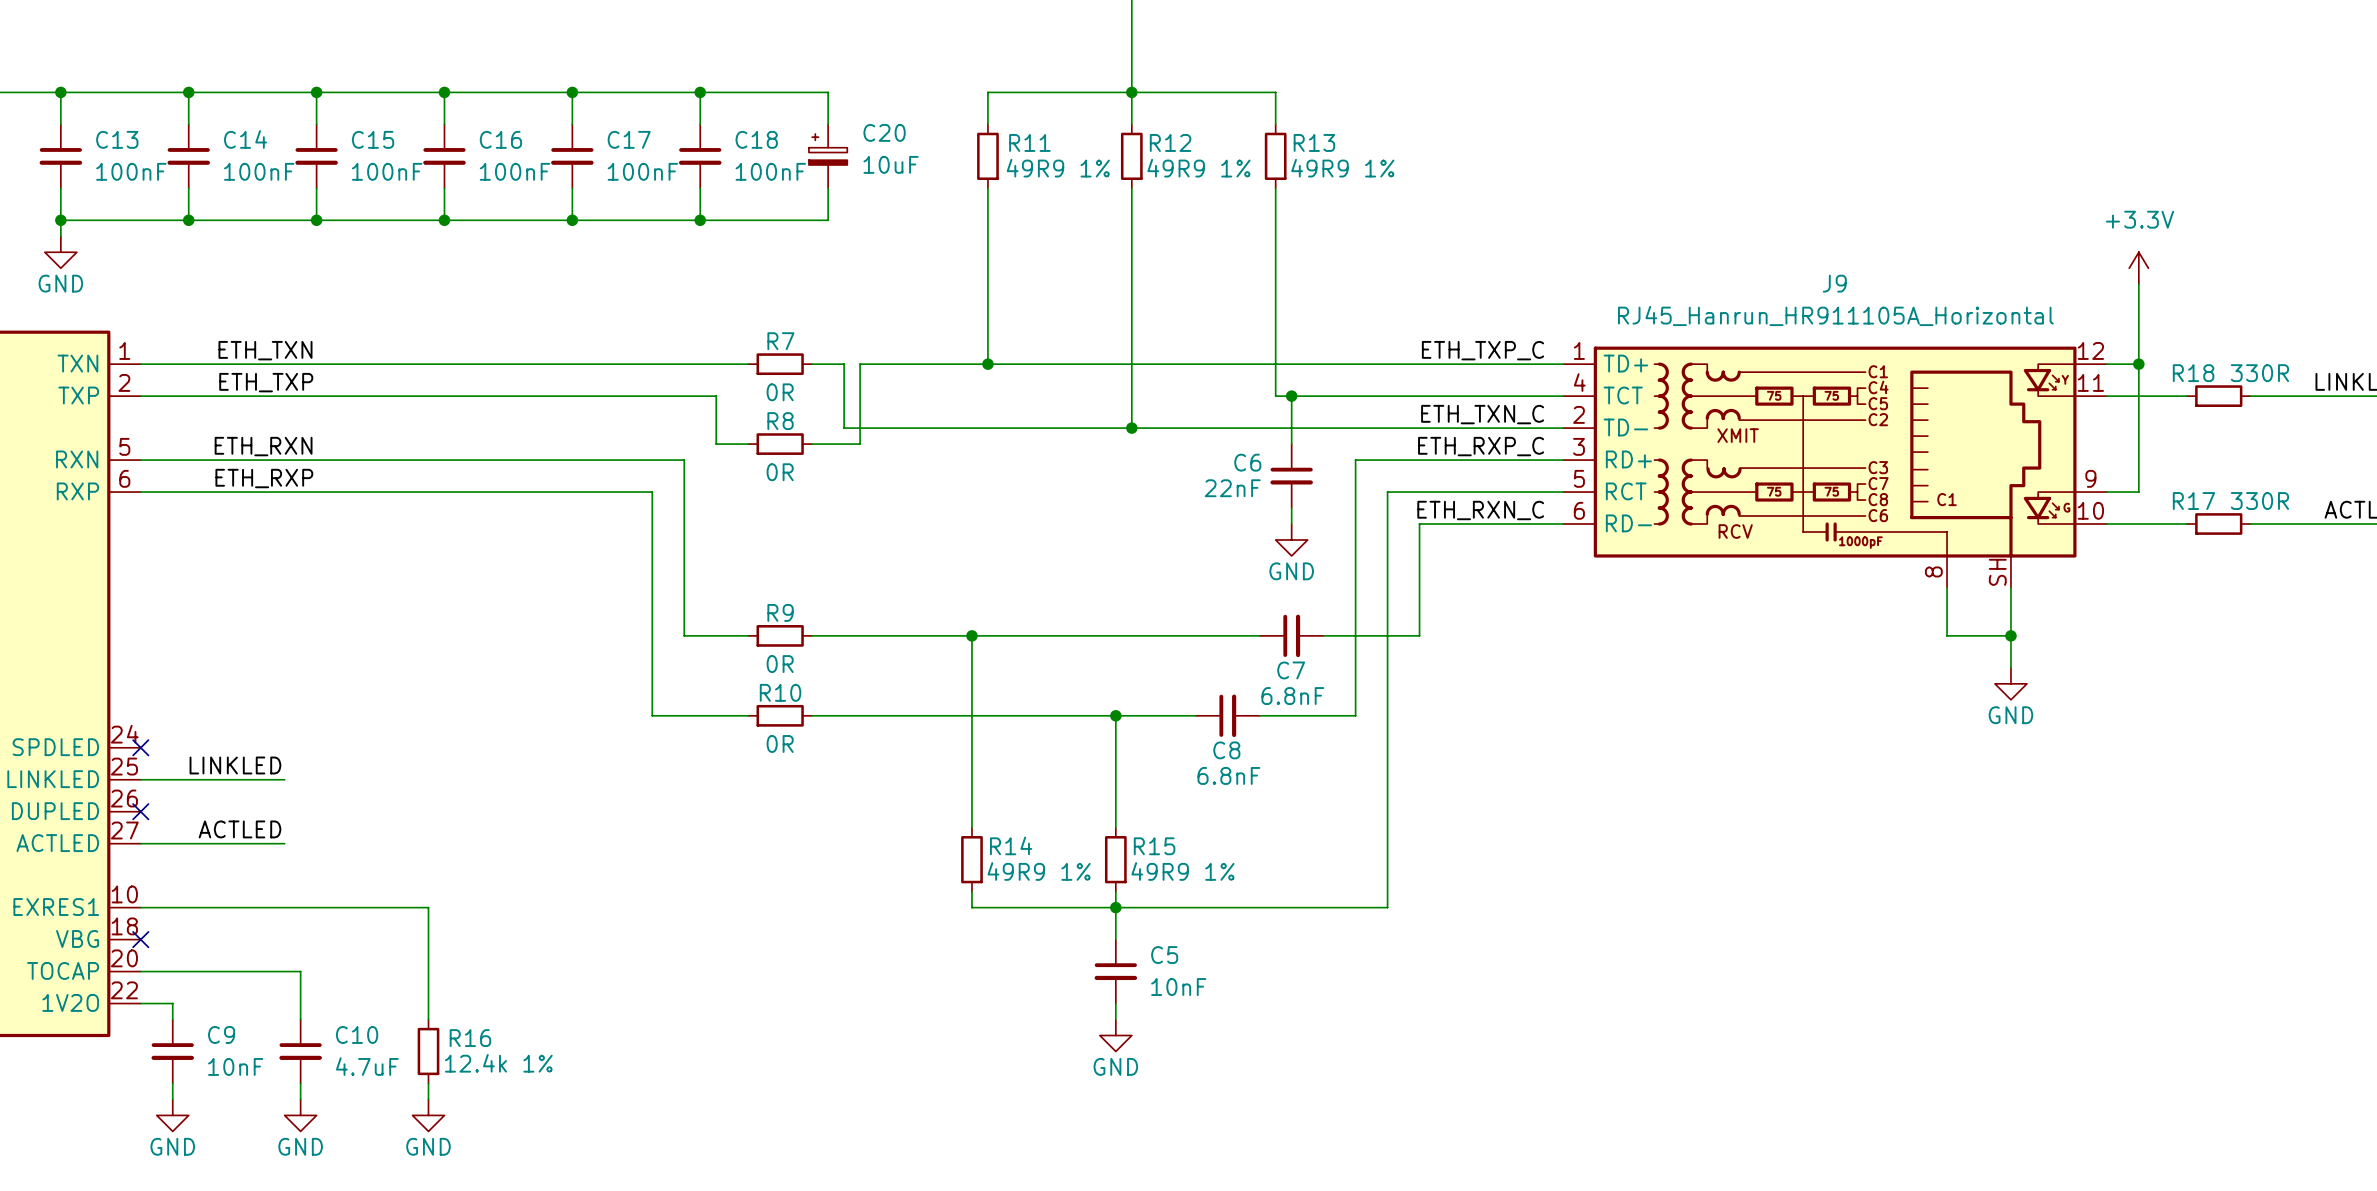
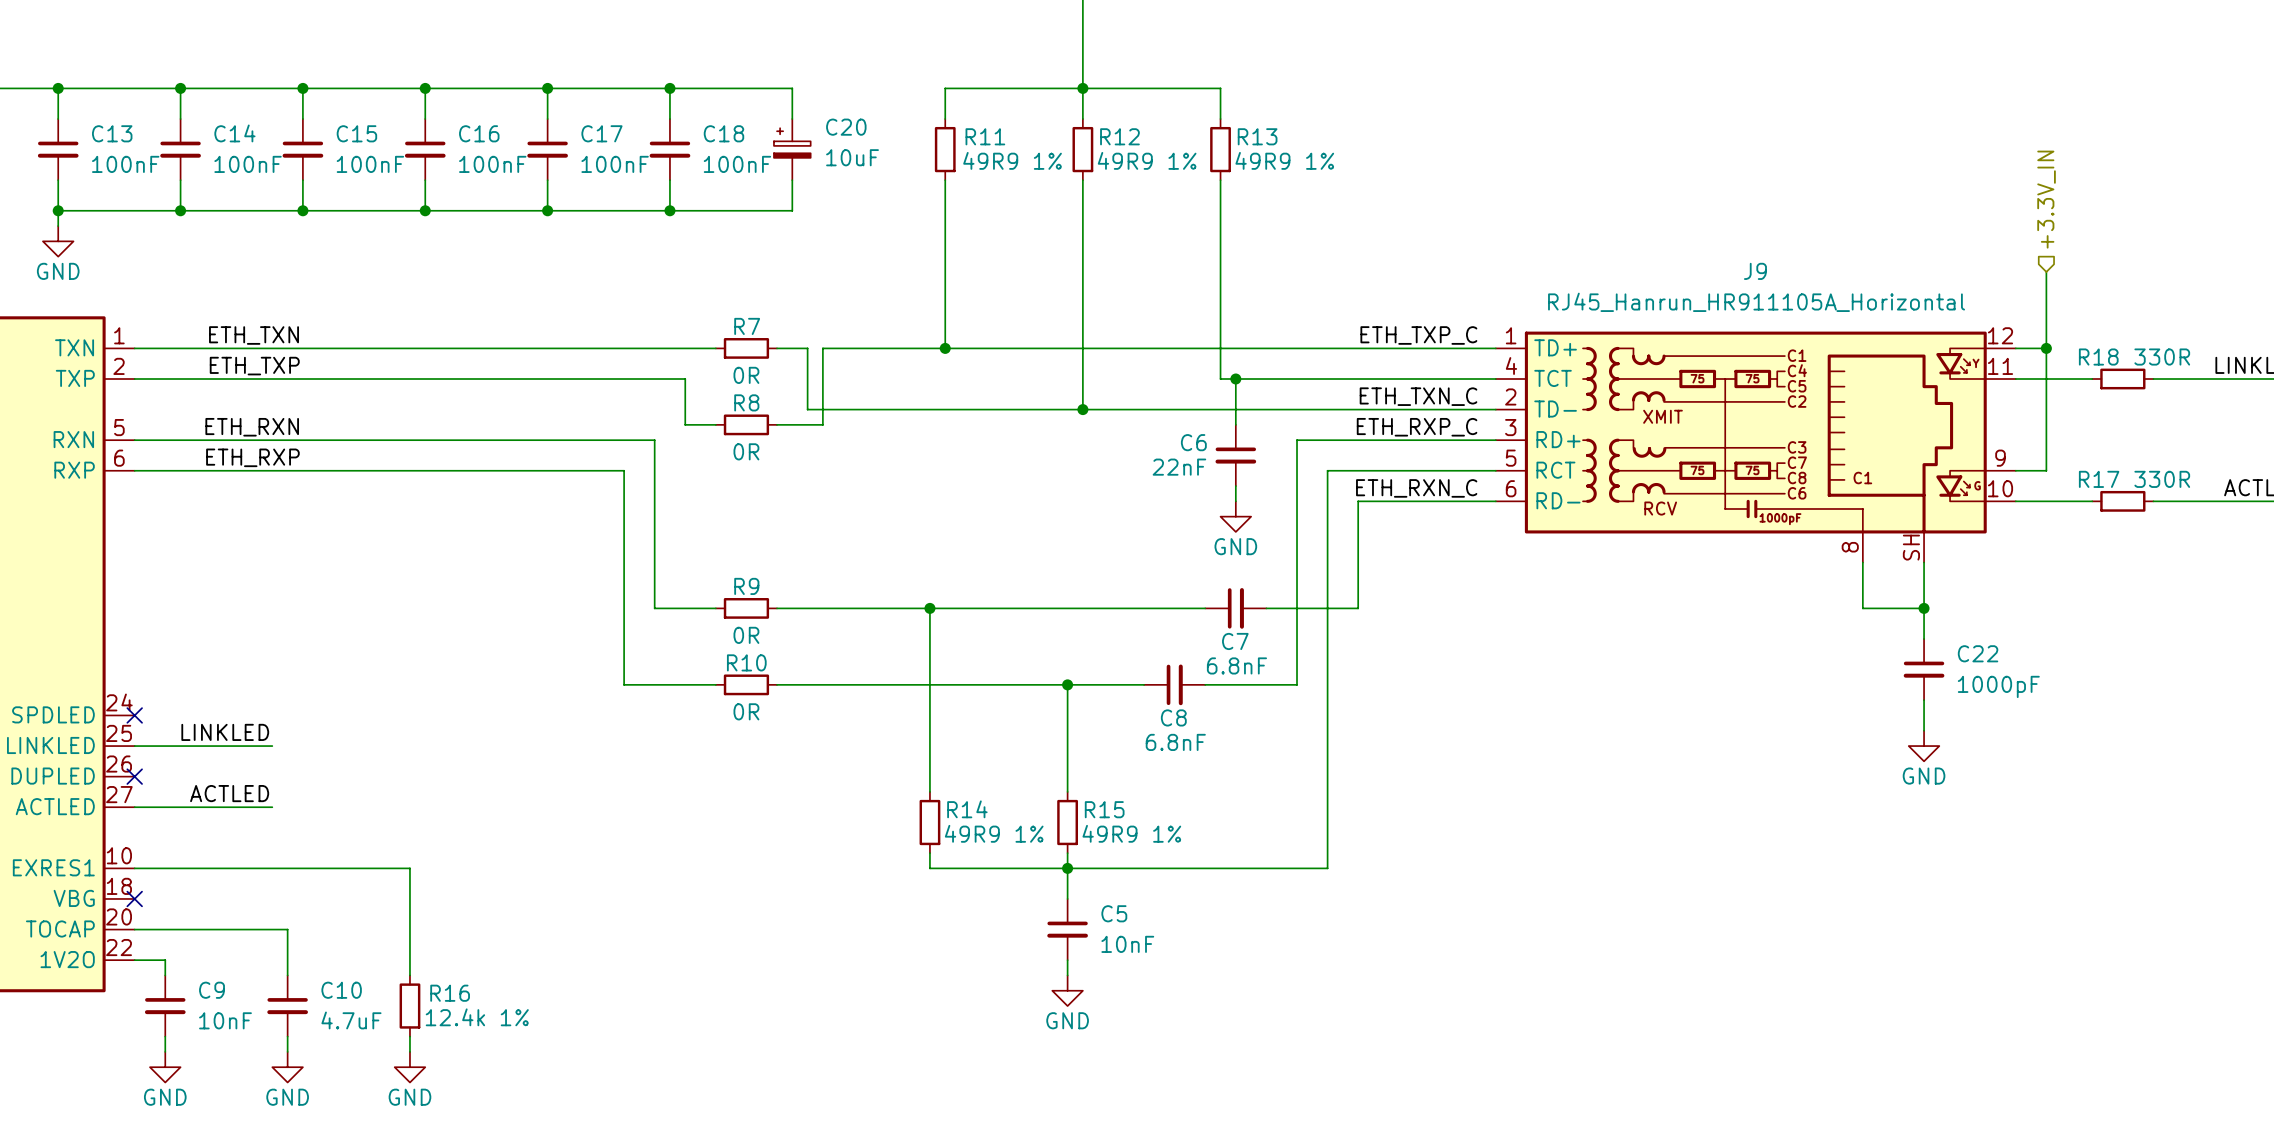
hierarchical label: none -> +3.3V_IN (2046, 199)
power symbol: +3.3V (2138, 268) -> none
power symbol position: GND (2010, 683) -> GND (1924, 746)
C22: none -> 1000pF (1924, 669)
wire: none -> (1924, 700) (1924, 730)

